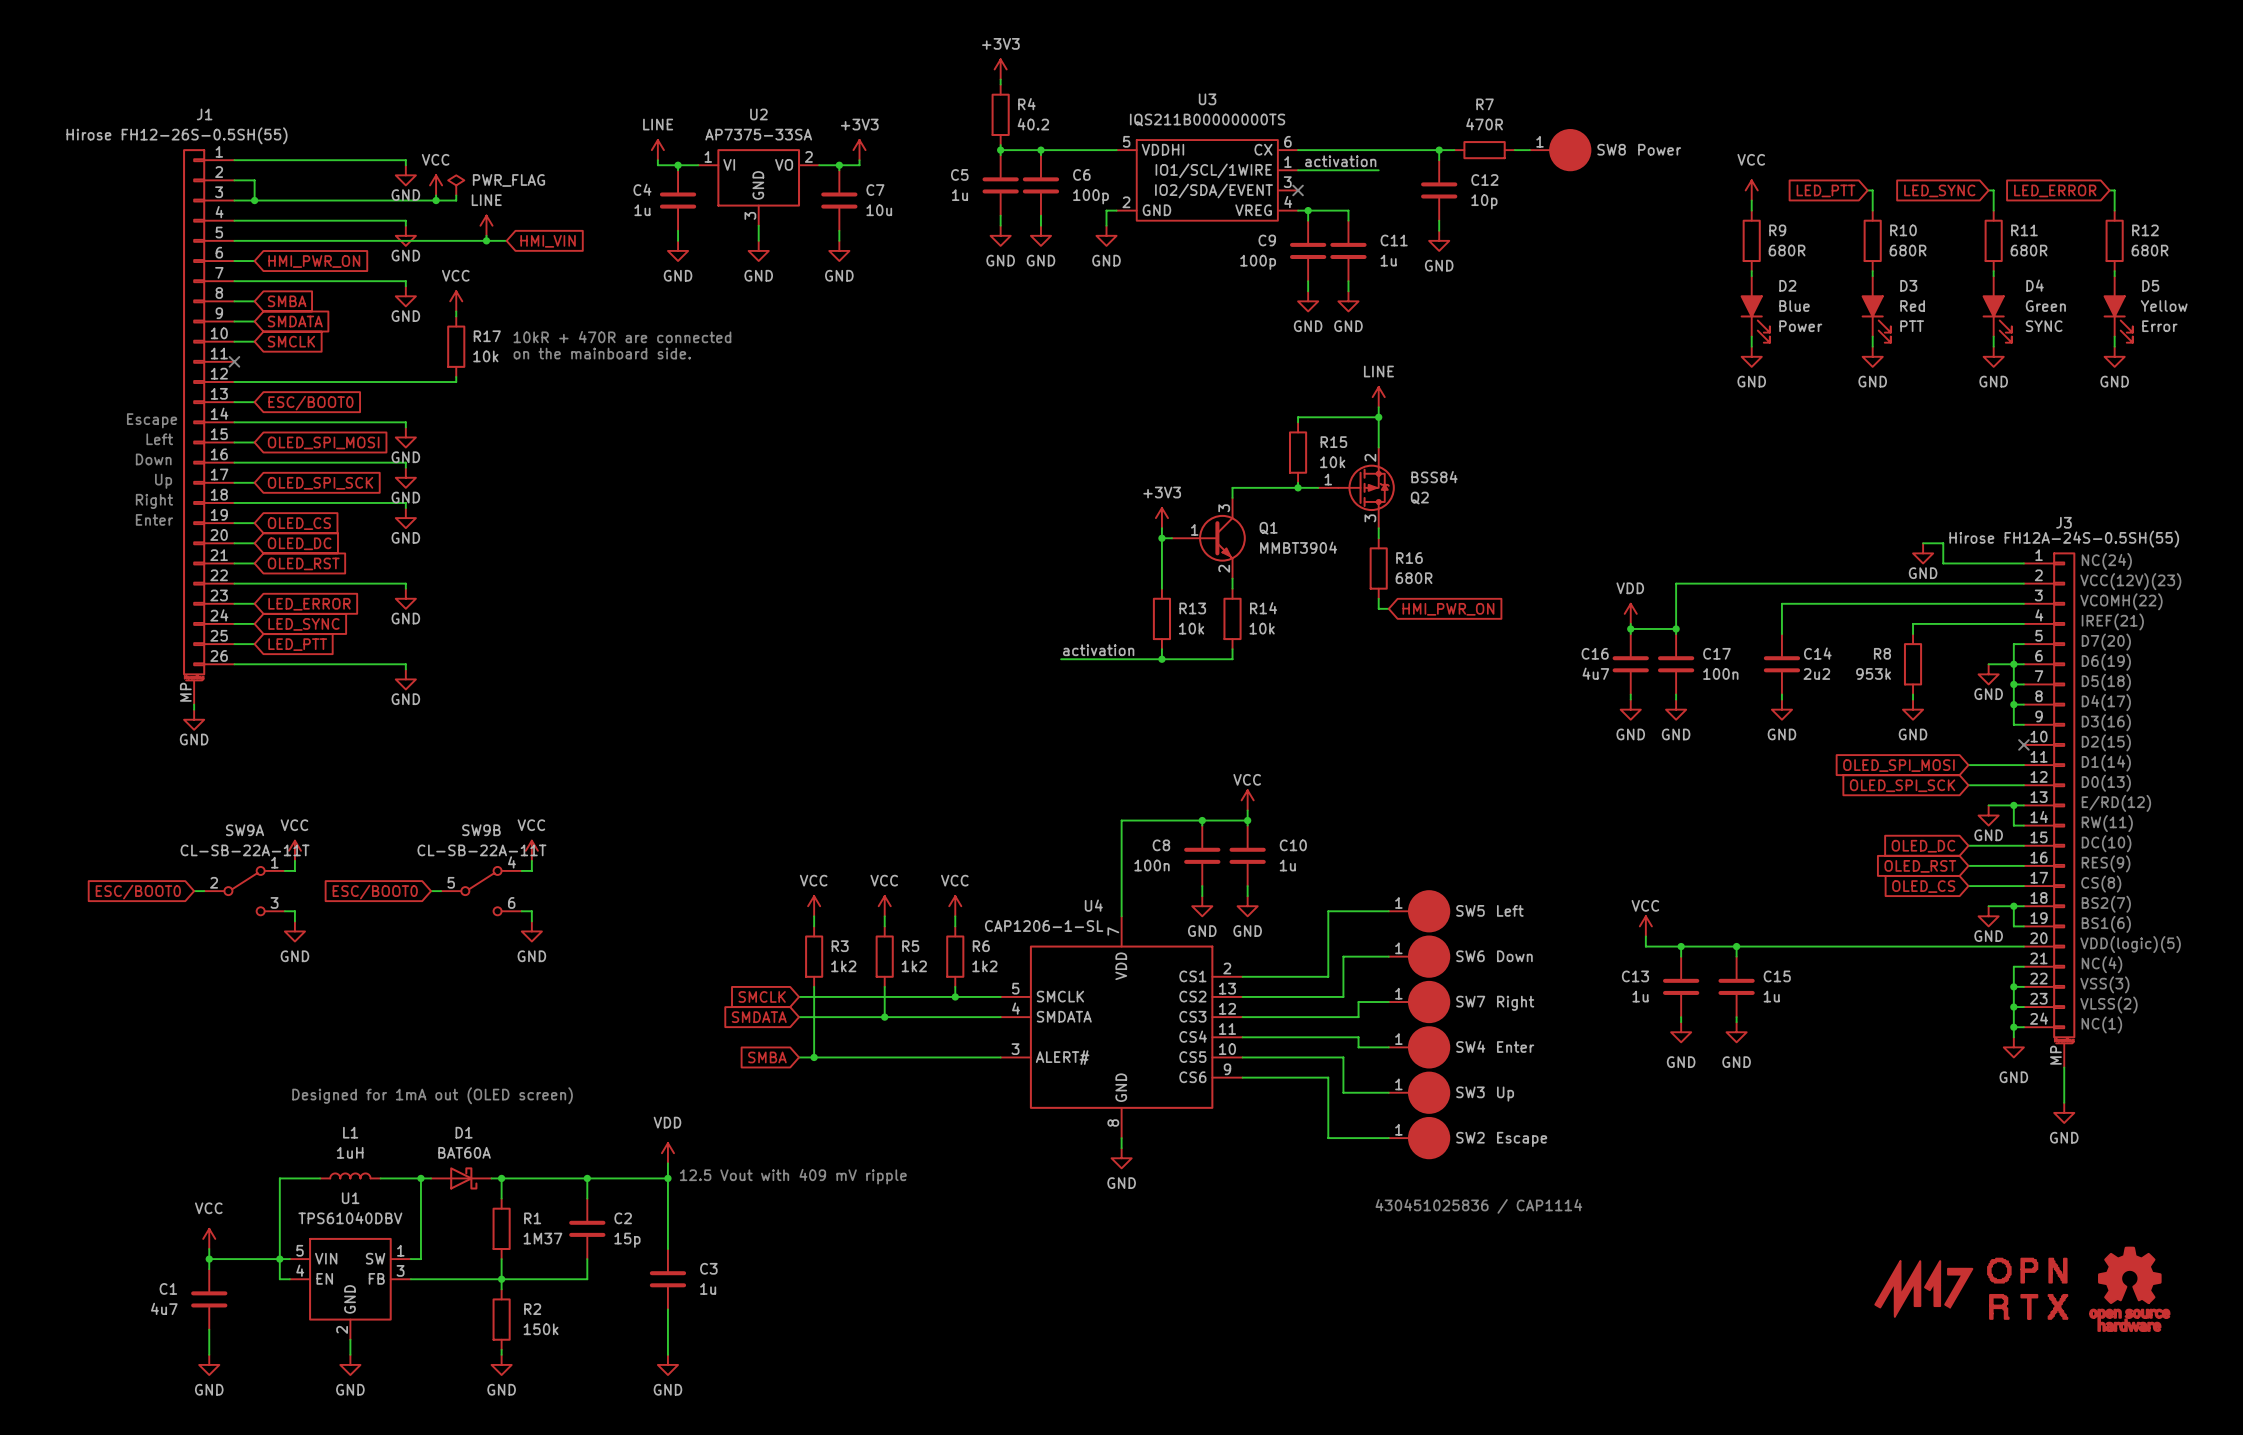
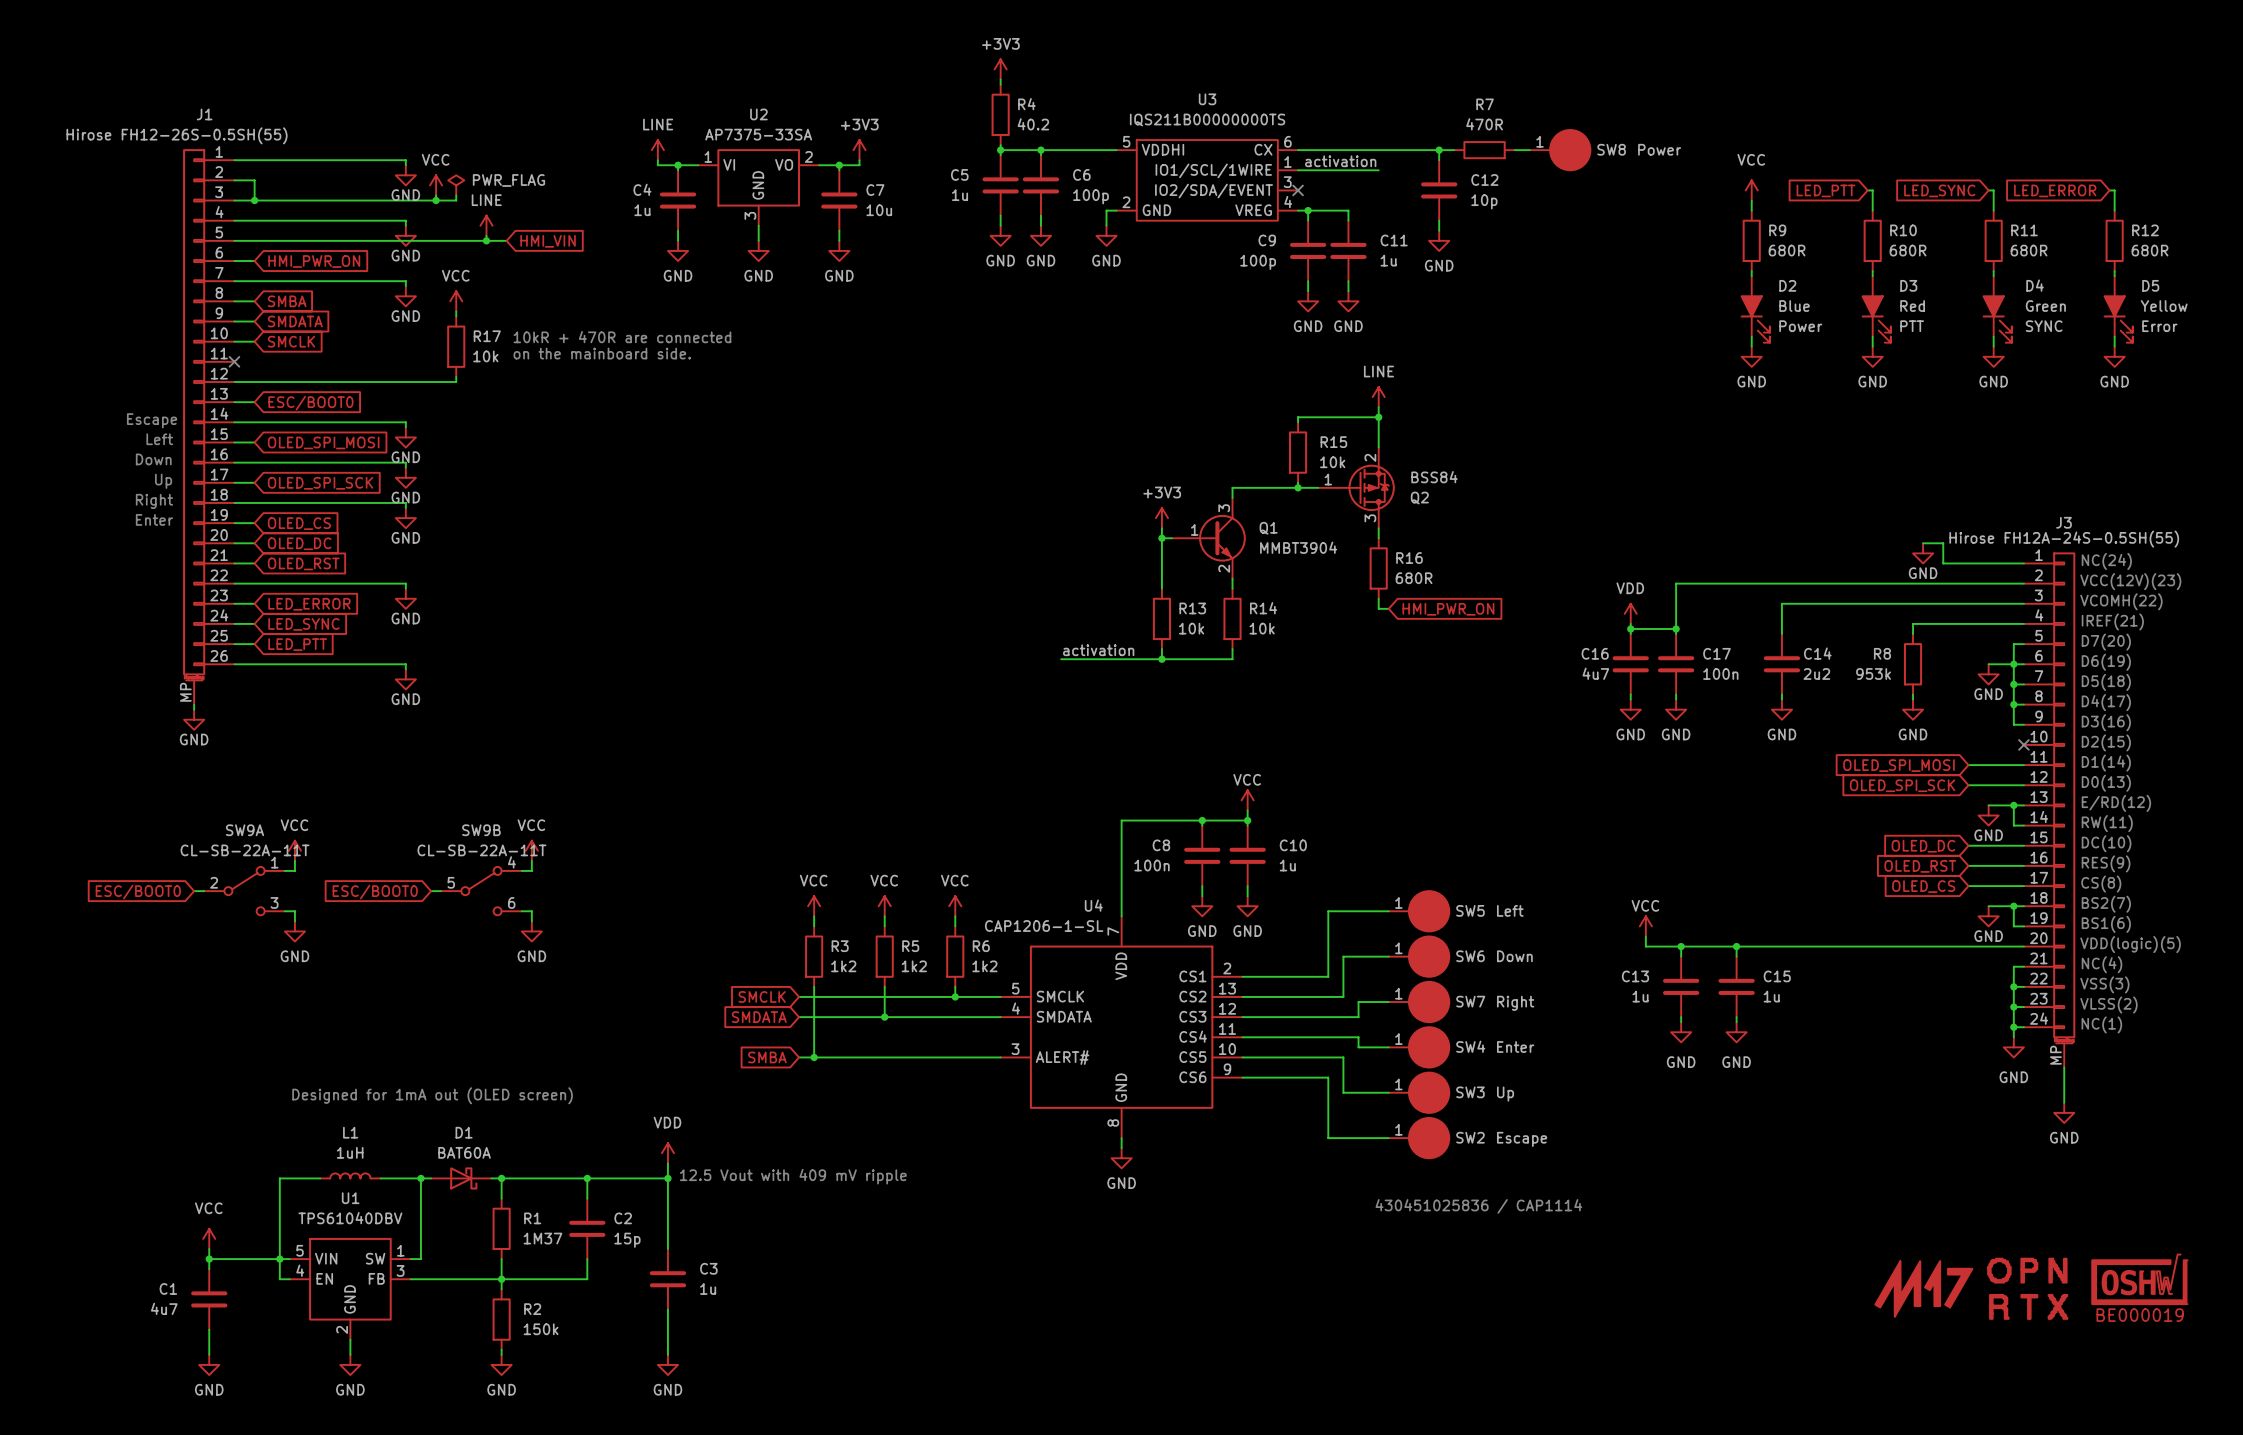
part: none -> (2139, 1279)
part: (2129, 1289) -> none

